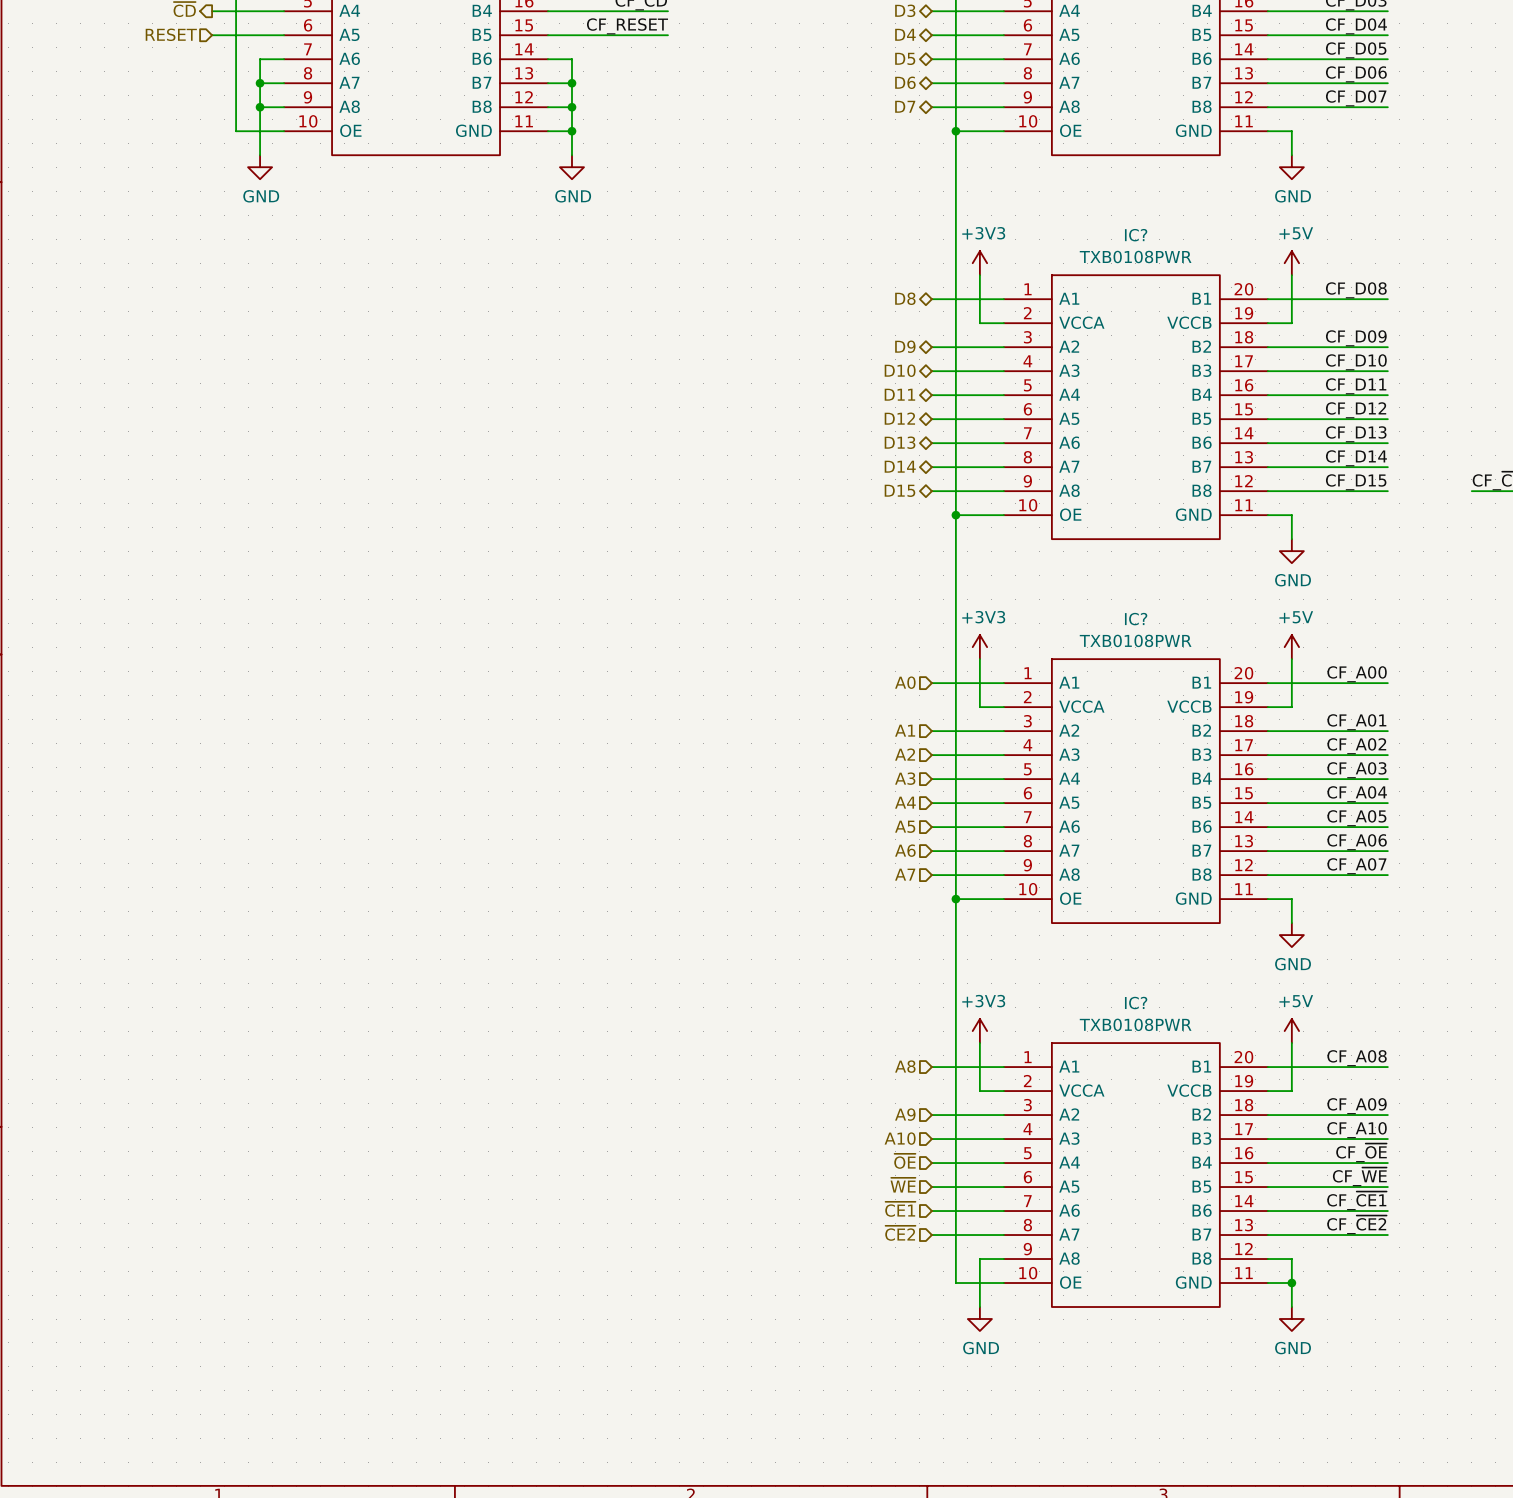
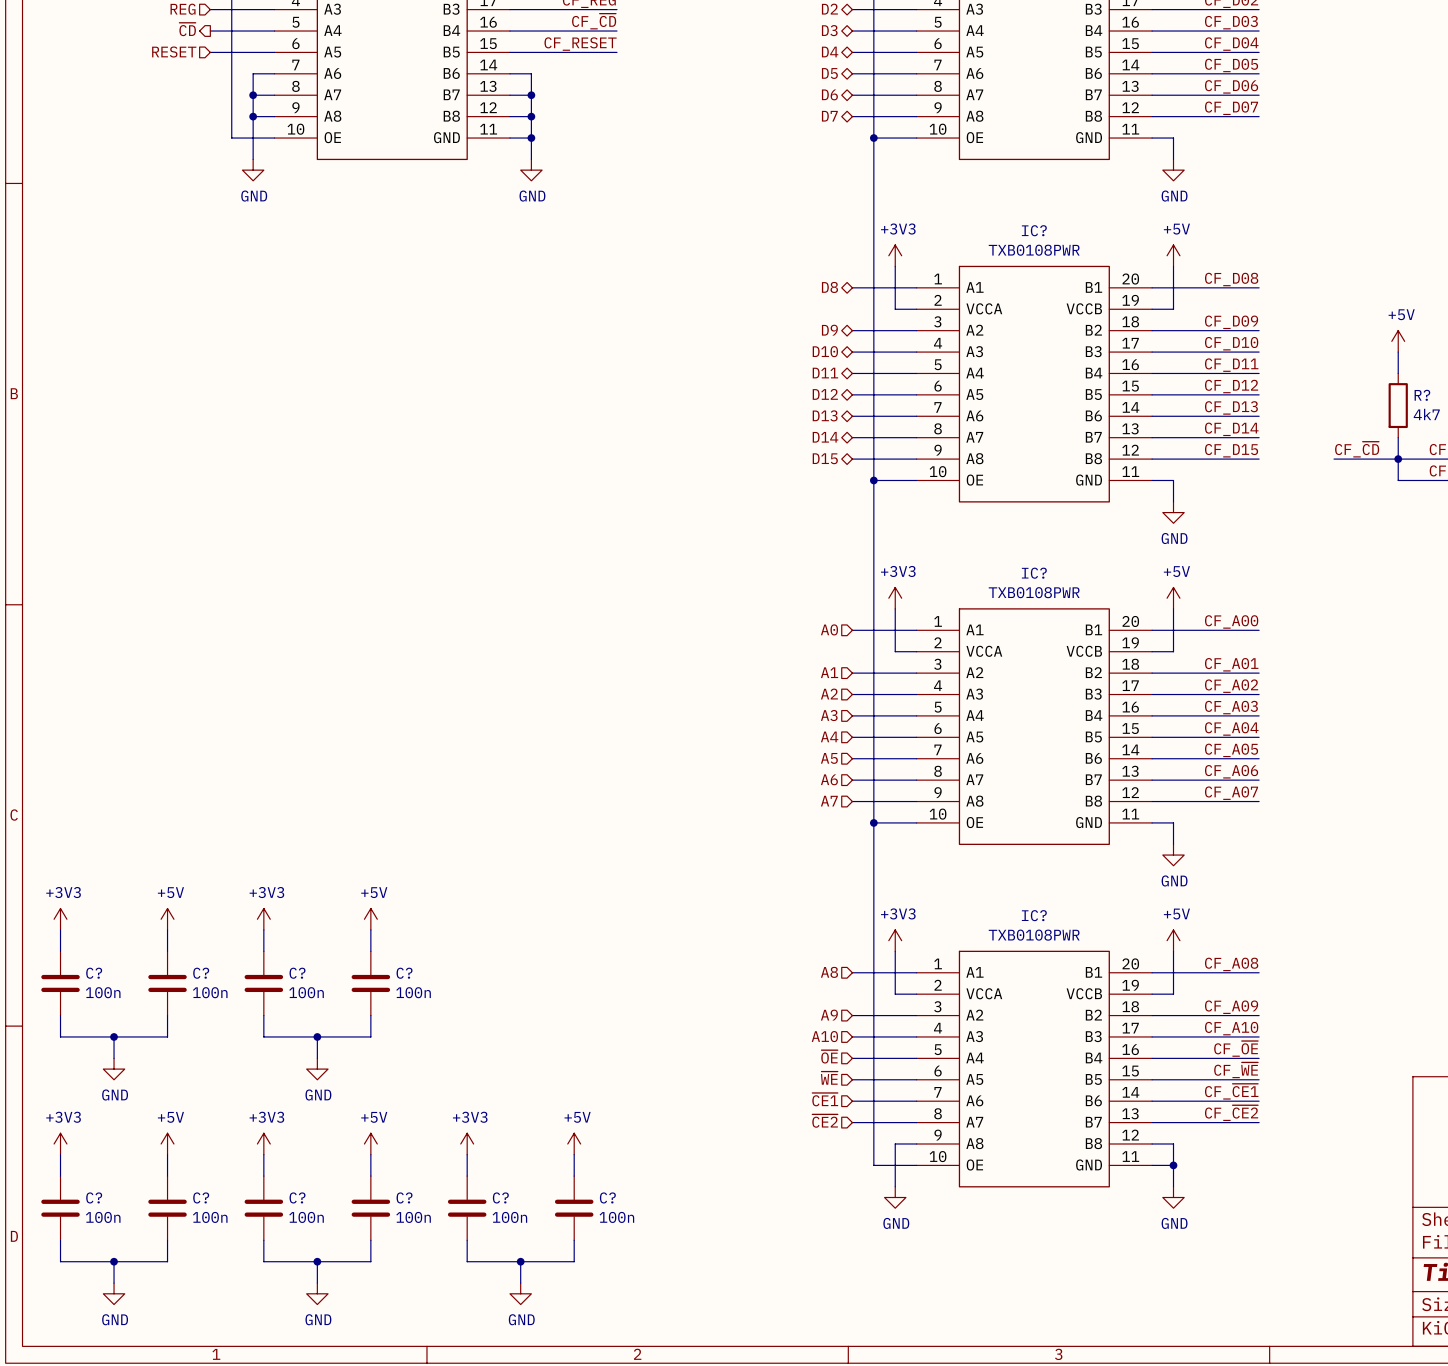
power symbol: none -> +3V3 (60, 919)
power symbol: none -> +5V (167, 919)
power symbol: none -> +3V3 (263, 919)
power symbol: none -> +5V (370, 919)
wire: none -> (60, 929) (60, 951)
wire: none -> (167, 929) (167, 951)
wire: none -> (263, 929) (263, 951)
wire: none -> (370, 929) (370, 951)
C?: none -> 100n (60, 983)
C?: none -> 100n (167, 983)
C?: none -> 100n (263, 983)
C?: none -> 100n (370, 983)
wire: none -> (60, 1015) (60, 1036) (167, 1036) (167, 1015)
wire: none -> (263, 1015) (263, 1036) (370, 1036) (370, 1015)
wire: none -> (114, 1036) (114, 1058)
junction: none -> (114, 1036)
wire: none -> (317, 1036) (317, 1058)
junction: none -> (317, 1036)
power symbol: none -> GND (114, 1069)
power symbol: none -> GND (317, 1069)
power symbol: none -> +3V3 (60, 1143)
power symbol: none -> +5V (167, 1143)
power symbol: none -> +3V3 (263, 1143)
power symbol: none -> +5V (370, 1143)
power symbol: none -> +3V3 (467, 1143)
power symbol: none -> +5V (574, 1143)
wire: none -> (60, 1154) (60, 1176)
wire: none -> (167, 1154) (167, 1176)
wire: none -> (263, 1154) (263, 1176)
wire: none -> (370, 1154) (370, 1176)
wire: none -> (467, 1154) (467, 1176)
wire: none -> (574, 1154) (574, 1176)
C?: none -> 100n (60, 1208)
C?: none -> 100n (167, 1208)
C?: none -> 100n (263, 1208)
C?: none -> 100n (370, 1208)
C?: none -> 100n (467, 1208)
C?: none -> 100n (574, 1208)
wire: none -> (60, 1240) (60, 1261) (167, 1261) (167, 1240)
wire: none -> (263, 1240) (263, 1261) (370, 1261) (370, 1240)
wire: none -> (467, 1240) (467, 1261) (574, 1261) (574, 1240)
wire: none -> (114, 1261) (114, 1283)
junction: none -> (114, 1261)
wire: none -> (317, 1261) (317, 1283)
junction: none -> (317, 1261)
wire: none -> (520, 1261) (520, 1283)
junction: none -> (520, 1261)
power symbol: none -> GND (114, 1293)
power symbol: none -> GND (317, 1293)
power symbol: none -> GND (520, 1293)

